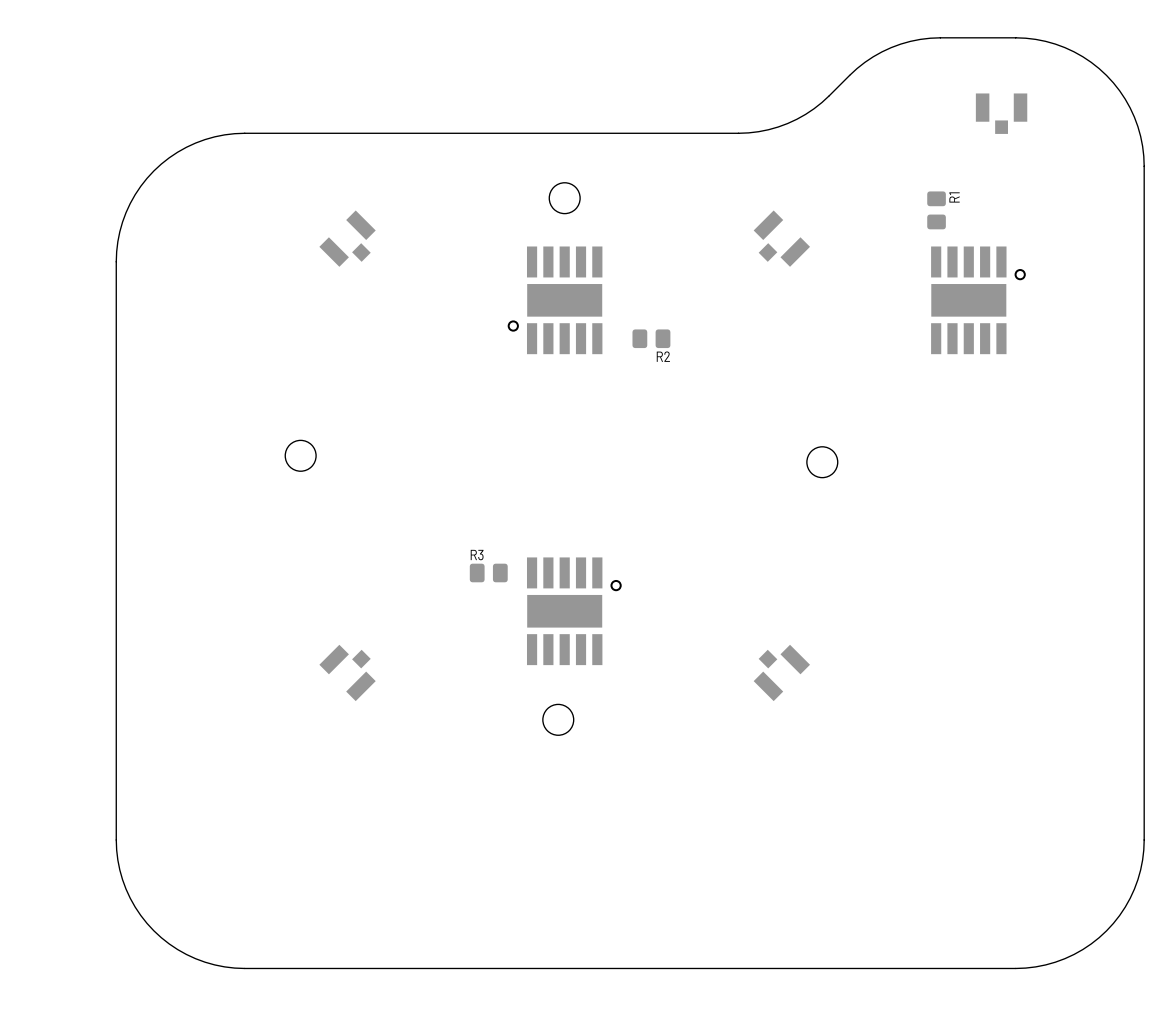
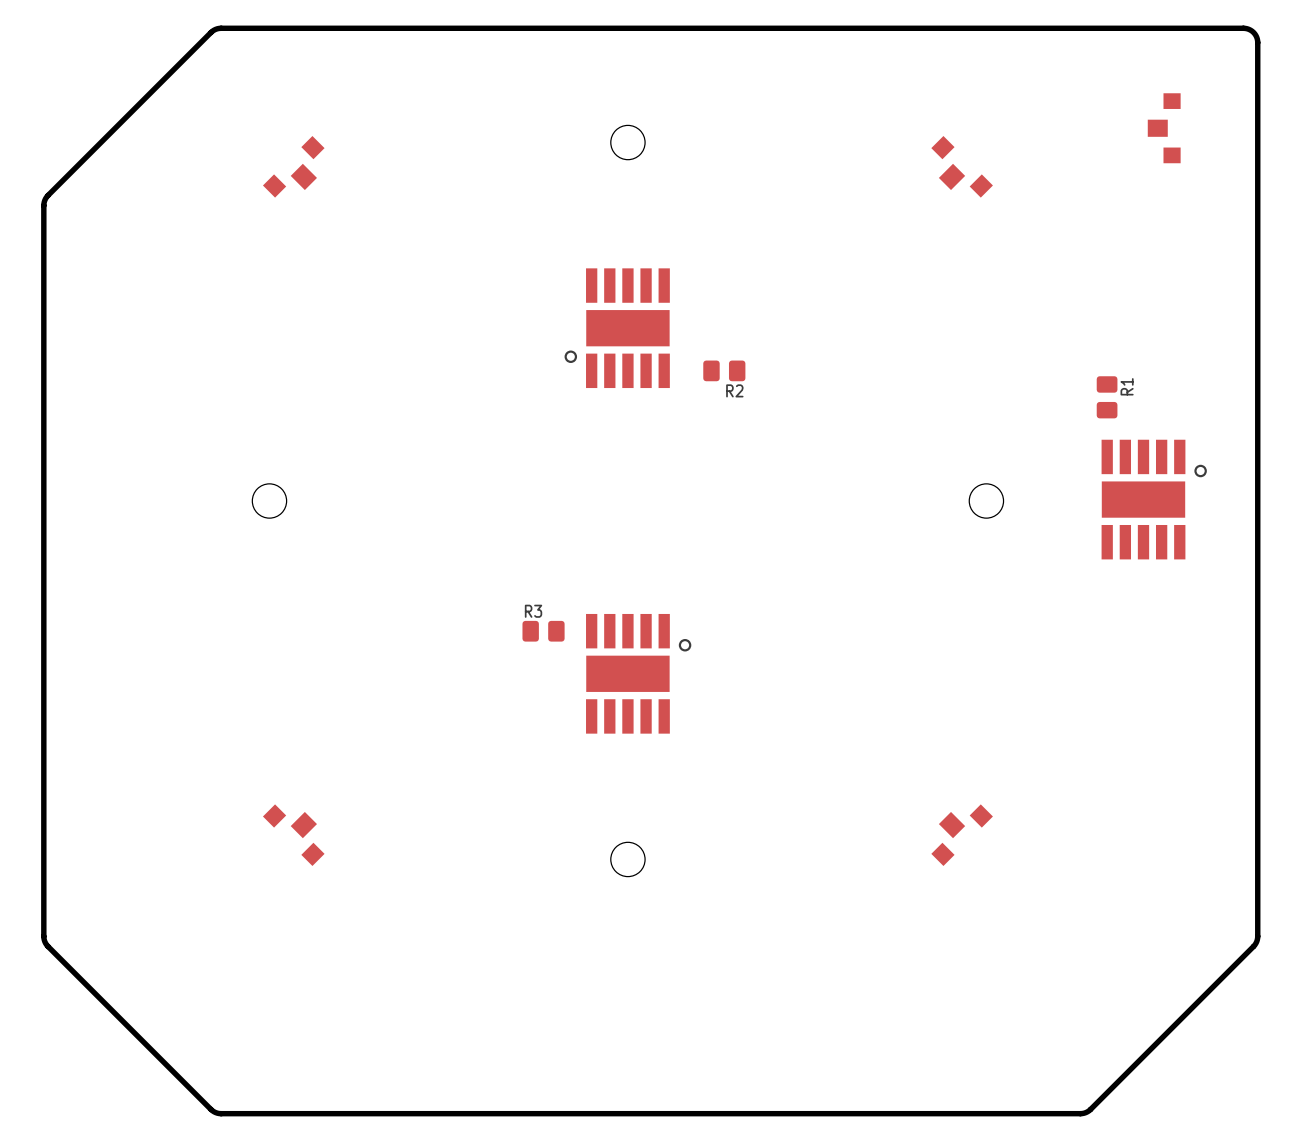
board edge: (940, 37) (1025, 38) (1055, 44) (1074, 51) (1099, 68) (1119, 90) (1134, 117) (1142, 146) (1144, 166) (1144, 839) (1142, 860) (1137, 879) (1130, 898) (1113, 923) (1091, 943) (1074, 954) (1045, 964) (1015, 968) (244, 968) (224, 966) (205, 962) (186, 954) (161, 937) (140, 915) (130, 898) (119, 869) (116, 839) (116, 251) (119, 231) (126, 212) (135, 194) (147, 178) (169, 157) (186, 147) (205, 139) (234, 133) (738, 133) (758, 131) (778, 127) (805, 114) (821, 102) (856, 68) (882, 51) (910, 41) (940, 37) -> (221, 28) (211, 32) (48, 195) (43, 203) (43, 936) (46, 945) (211, 1109) (219, 1113) (1080, 1113) (1089, 1110) (1253, 946) (1257, 938) (1257, 42) (1254, 33) (1243, 28) (221, 28)
part: (1001, 113) -> none
part: none -> (1164, 128)
part: none -> (293, 166)
part: none -> (962, 166)
round board edge position: (564, 198) -> (627, 142)
R1 position: (936, 210) -> (1107, 397)
part: (347, 238) -> none
part: (781, 238) -> none
part position: (978, 300) -> (1154, 499)
round board edge position: (300, 455) -> (269, 501)
round board edge position: (822, 462) -> (986, 501)
part: (347, 672) -> none
part: (781, 672) -> none
round board edge position: (558, 719) -> (627, 859)
part: none -> (293, 835)
part: none -> (962, 835)

